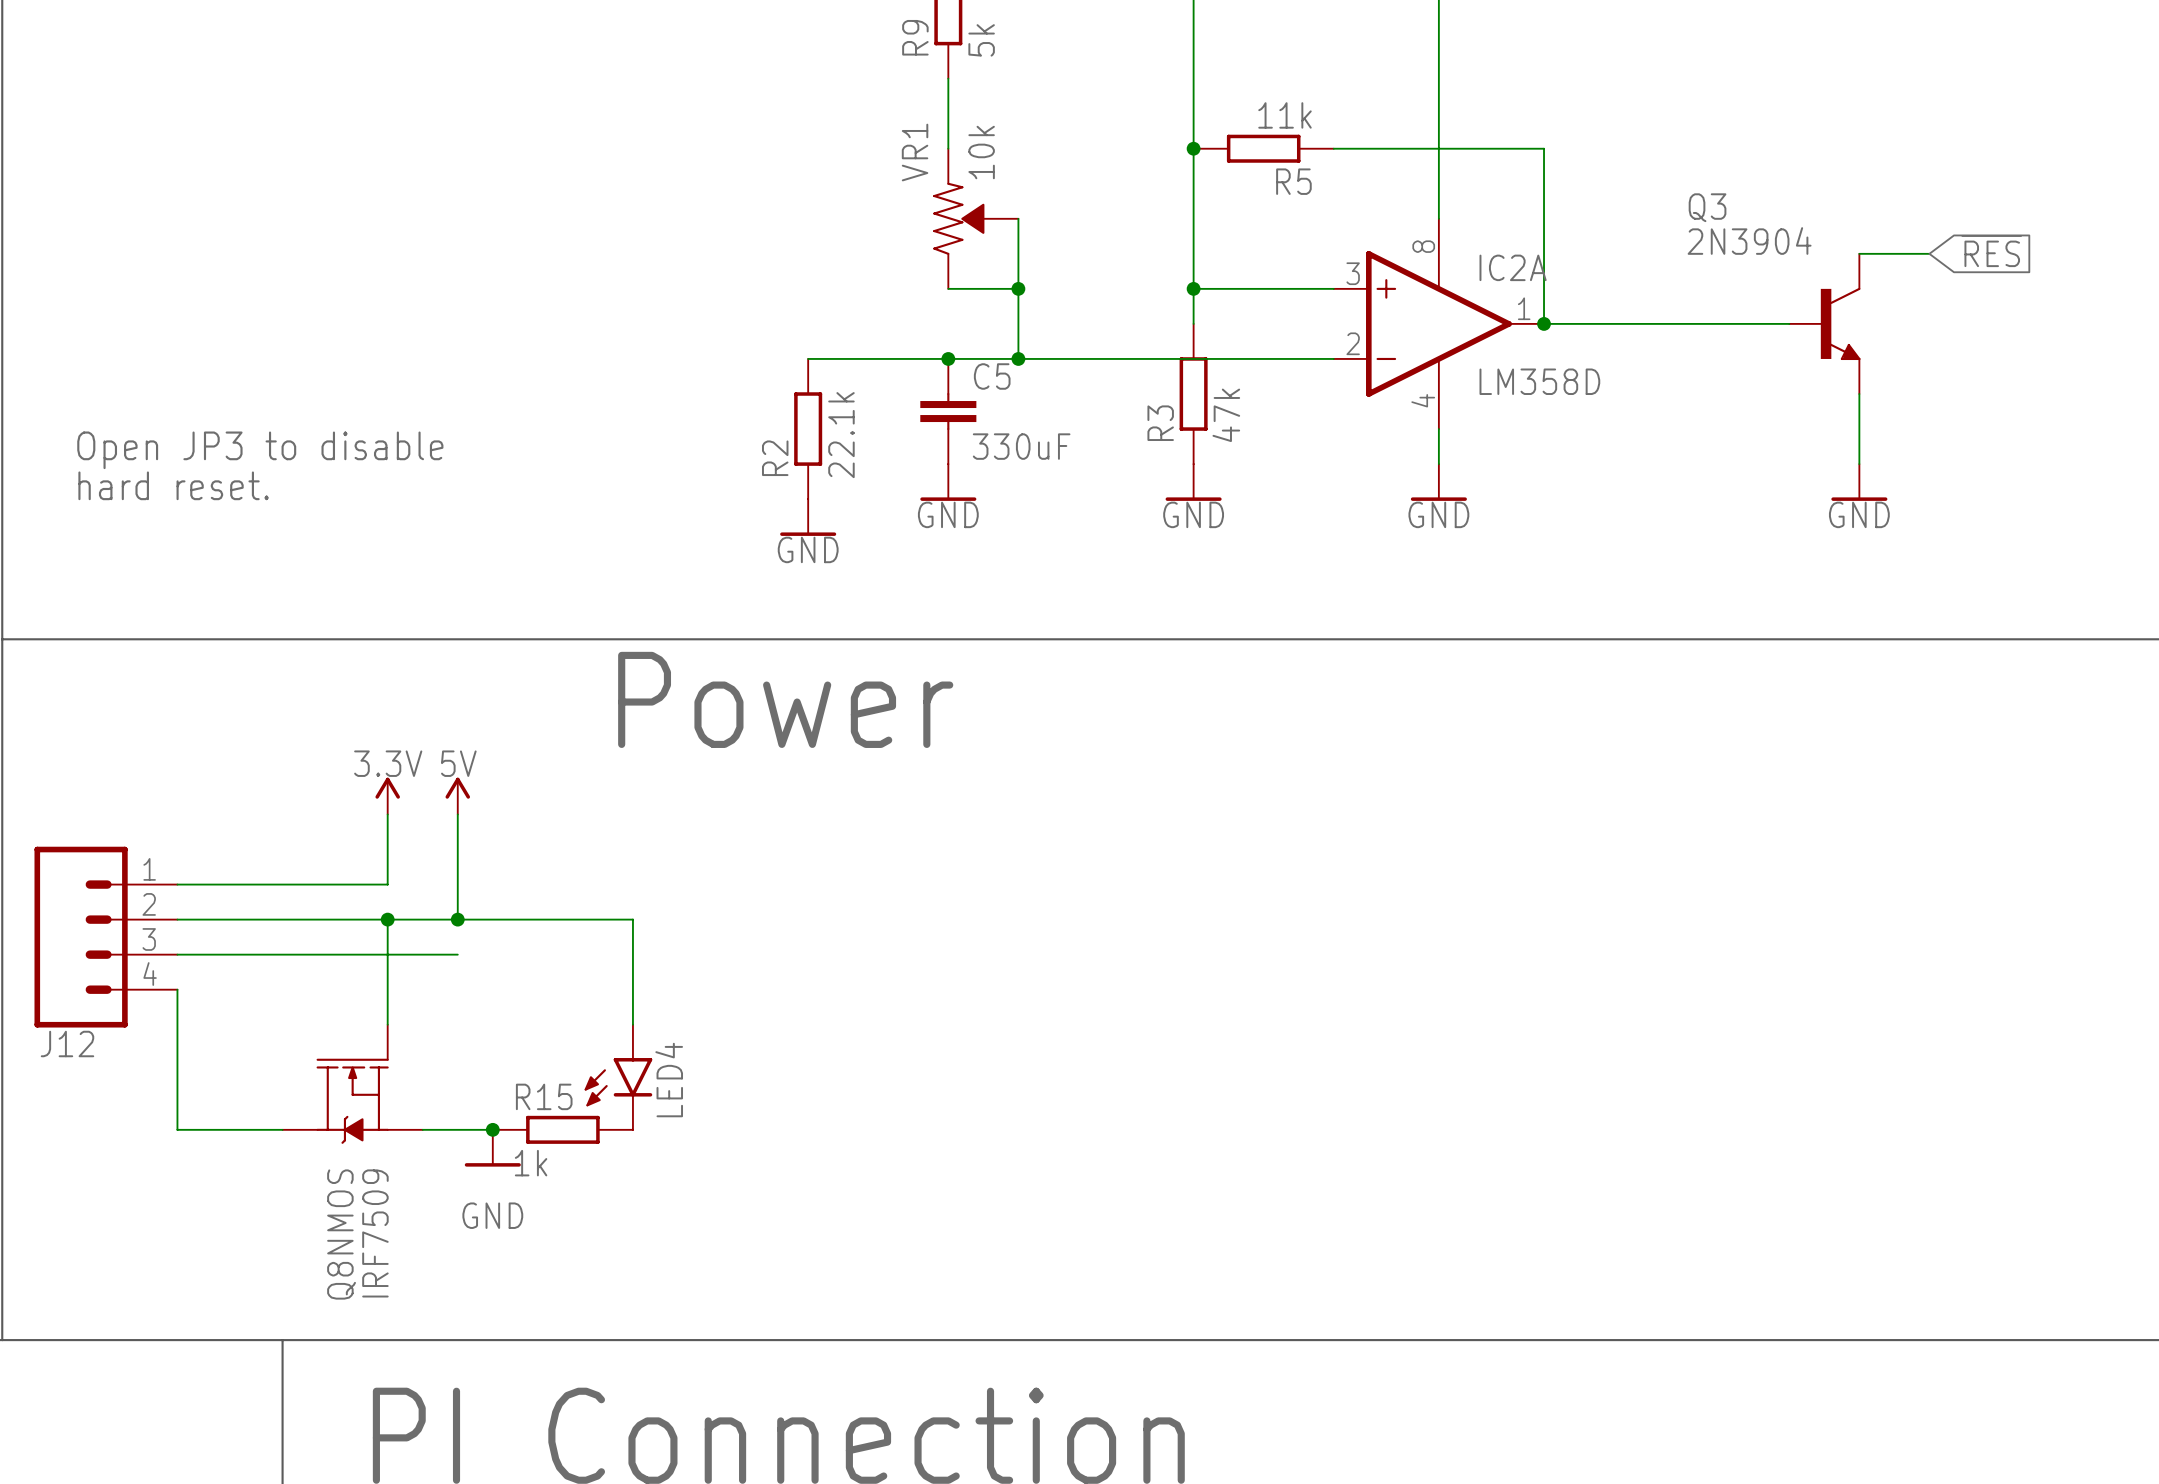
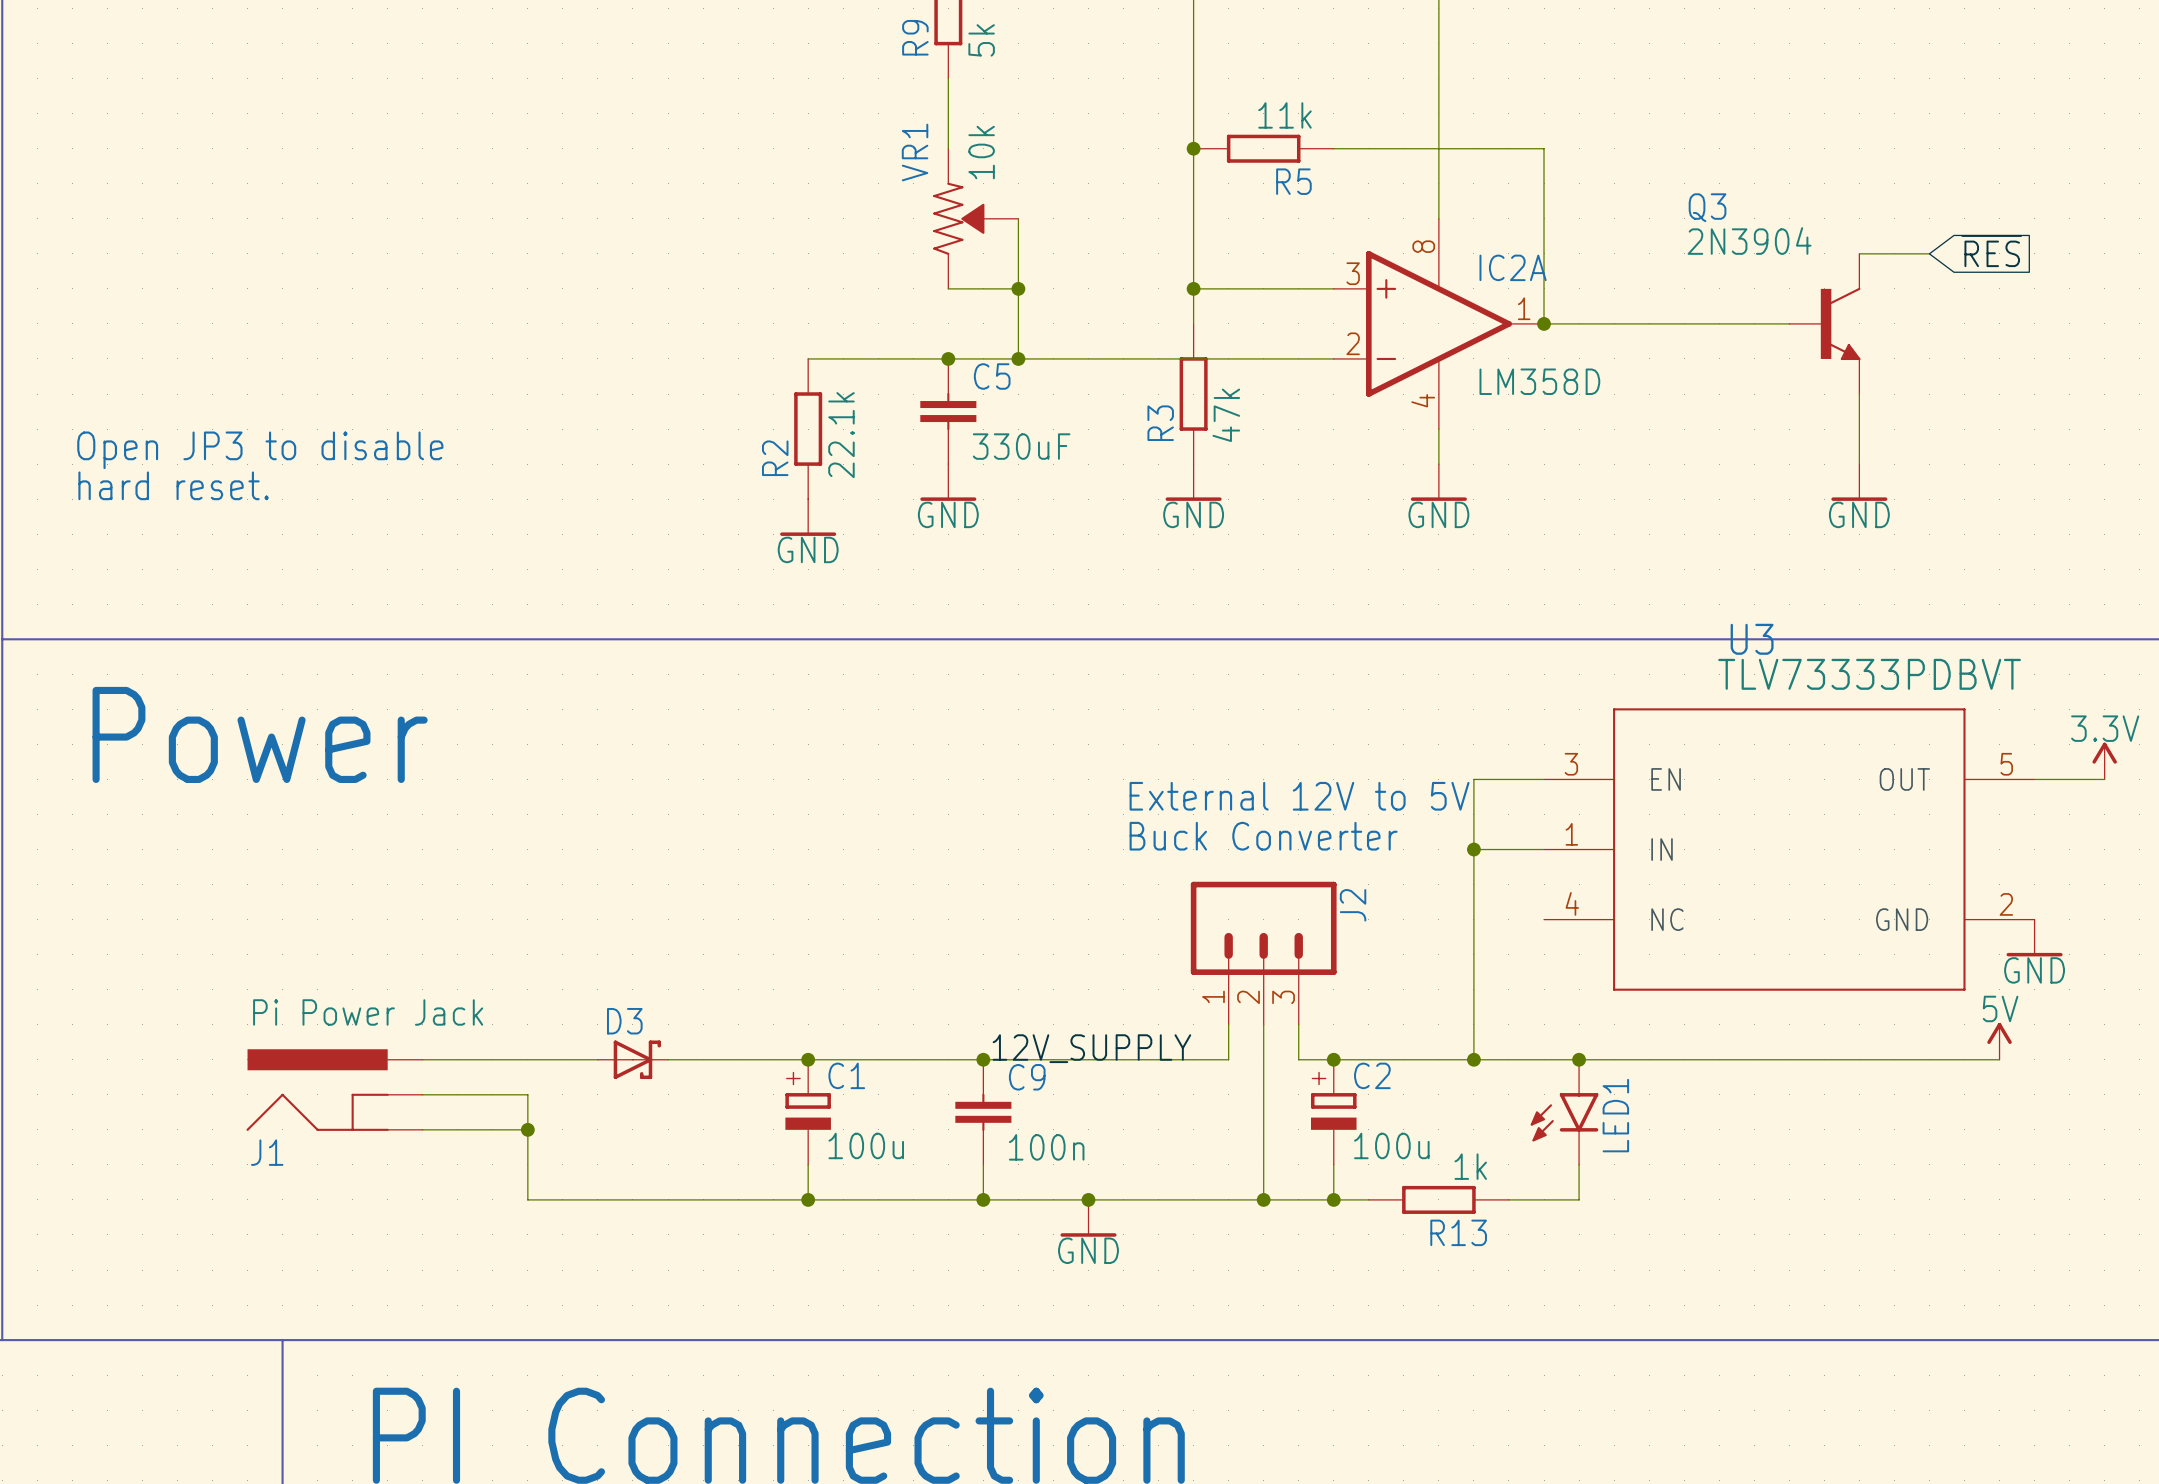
text: Power (785, 699) -> none
text: none -> Power (260, 734)
power symbol: none -> 3.3V (2104, 761)
wire: none -> (1544, 779) (1473, 779) (1473, 1059)
wire: none -> (2034, 779) (2104, 779)
power symbol: 3.3V (387, 796) -> none
power symbol: 5V (457, 796) -> none
text: none -> External 12V to 5V (1299, 796)
wire: (387, 814) (387, 884) (177, 884) -> none
wire: (457, 814) (457, 919) -> none
text: none -> Buck Converter (1263, 836)
wire: none -> (1473, 849) (1544, 849)
junction: none -> (1473, 849)
U3: none -> TLV73333PDBVT (1789, 849)
wire: (177, 919) (632, 919) (632, 1024) -> none
wire: (387, 919) (387, 1024) -> none
junction: (387, 919) -> none
junction: (457, 919) -> none
J12: (105, 937) -> none
power symbol: none -> GND (2034, 938)
J2: none -> (1263, 953)
wire: (177, 954) (457, 954) -> none
wire: (177, 989) (177, 1129) (282, 1129) -> none
wire: none -> (1228, 1024) (1228, 1059) (668, 1059)
wire: none -> (1263, 1024) (1263, 1199)
wire: none -> (1298, 1024) (1298, 1059) (1999, 1059)
power symbol: none -> 5V (1999, 1041)
label: none -> 12V_SUPPLY (1091, 1048)
wire: none -> (422, 1059) (597, 1059)
D3: none -> (632, 1059)
junction: none -> (808, 1059)
junction: none -> (983, 1059)
junction: none -> (1333, 1059)
junction: none -> (1473, 1059)
junction: none -> (1579, 1059)
LED4: (618, 1077) -> none
Q8NMOS: IRF7509 (352, 1084) -> none
J1: none -> Pi Power Jack (334, 1090)
wire: none -> (422, 1094) (527, 1094) (527, 1199) (1368, 1199)
C1: none -> 100u (808, 1112)
C9: none -> 100n (983, 1112)
C2: none -> 100u (1333, 1112)
LED1: none -> (1564, 1112)
junction position: (492, 1129) -> (527, 1129)
R15: 1k (562, 1129) -> none
power symbol: GND (492, 1148) -> none
wire: none -> (808, 1164) (808, 1199)
wire: none -> (983, 1164) (983, 1199)
wire: none -> (1333, 1164) (1333, 1199)
wire: none -> (1579, 1164) (1579, 1199) (1508, 1199)
junction: none -> (808, 1199)
junction: none -> (983, 1199)
junction: none -> (1088, 1199)
junction: none -> (1263, 1199)
junction: none -> (1333, 1199)
R13: none -> 1k (1438, 1199)
power symbol: none -> GND (1088, 1218)

